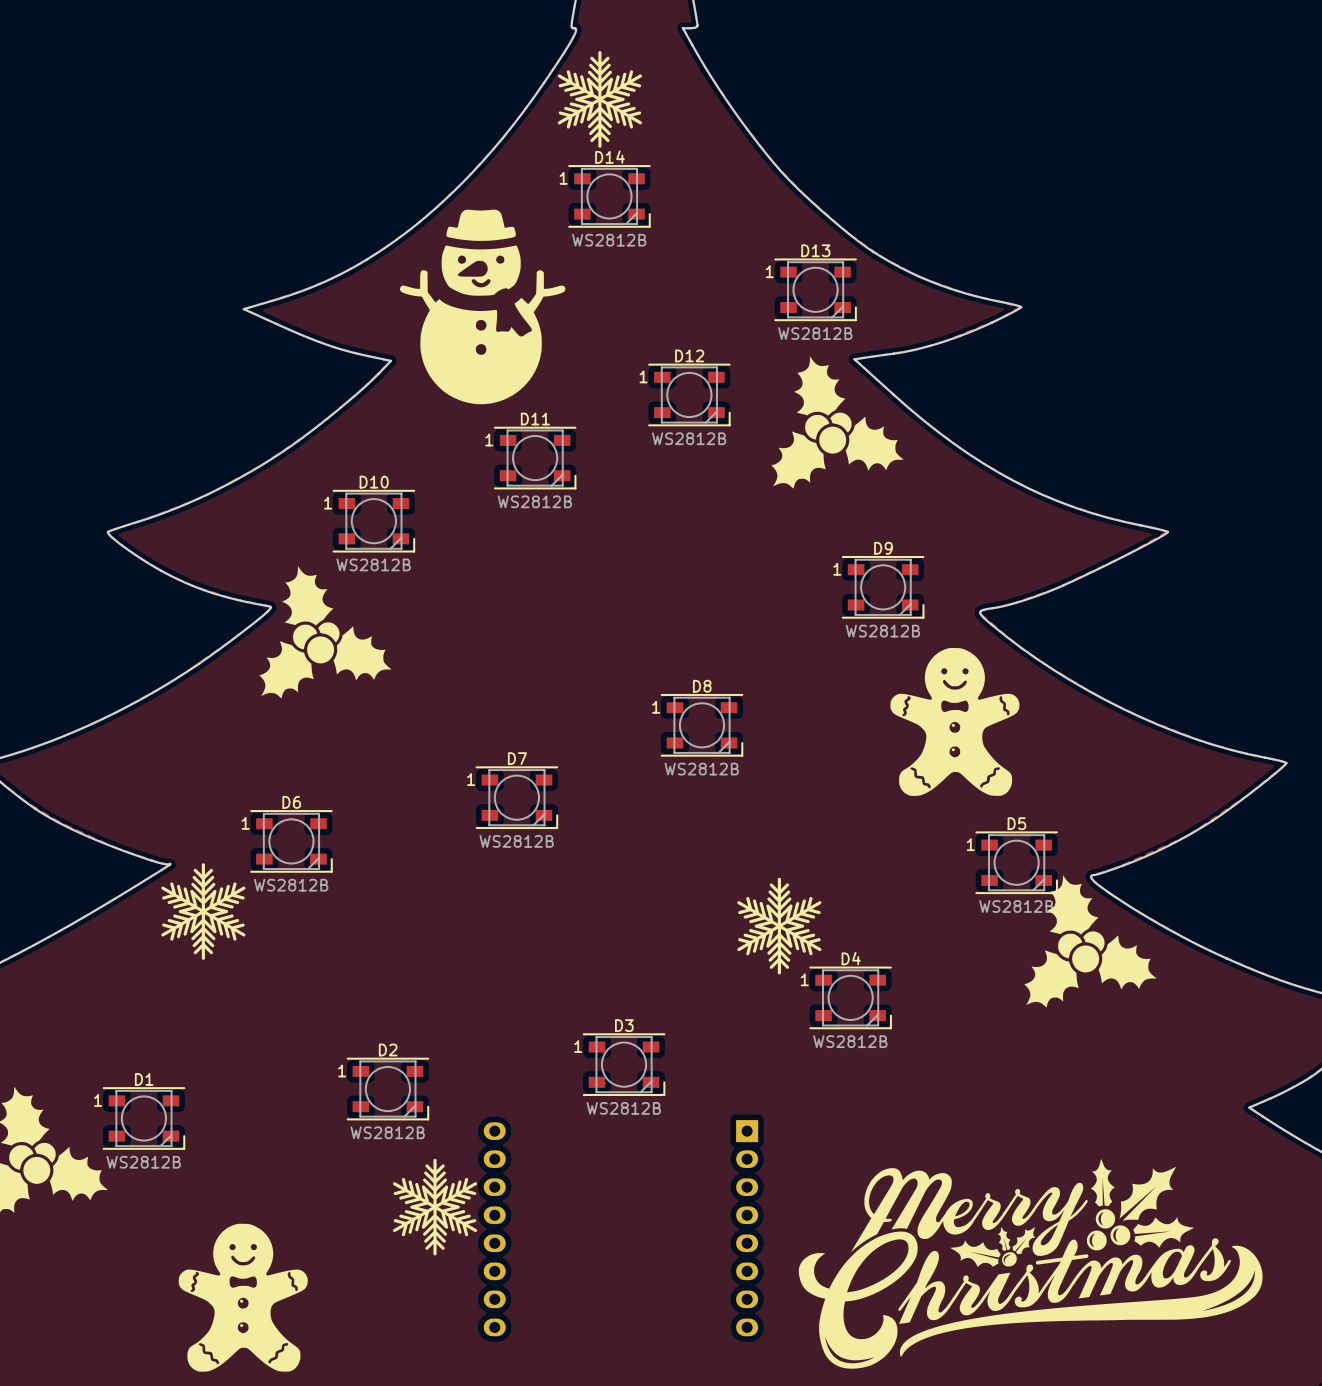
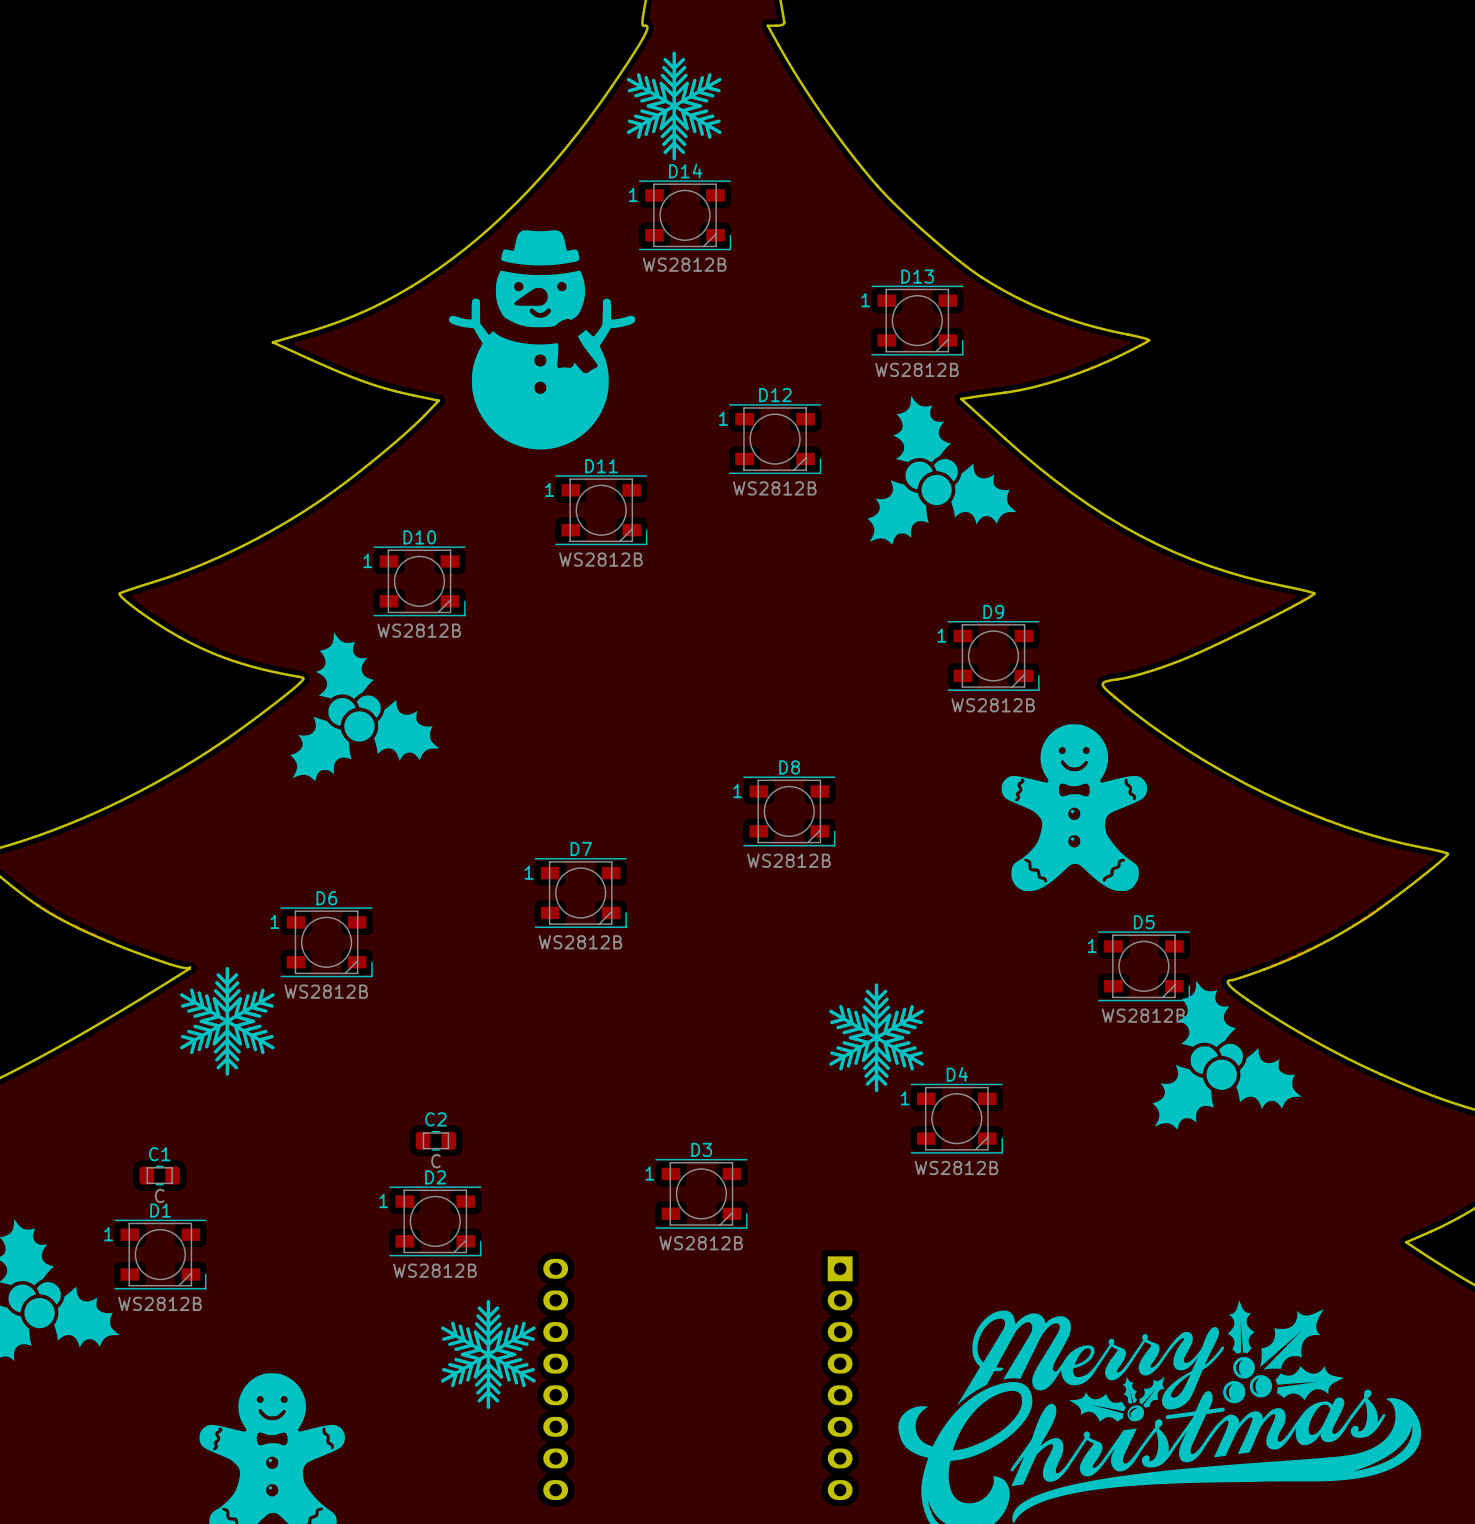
C2: none -> C (435, 1140)
C1: none -> C (159, 1175)

